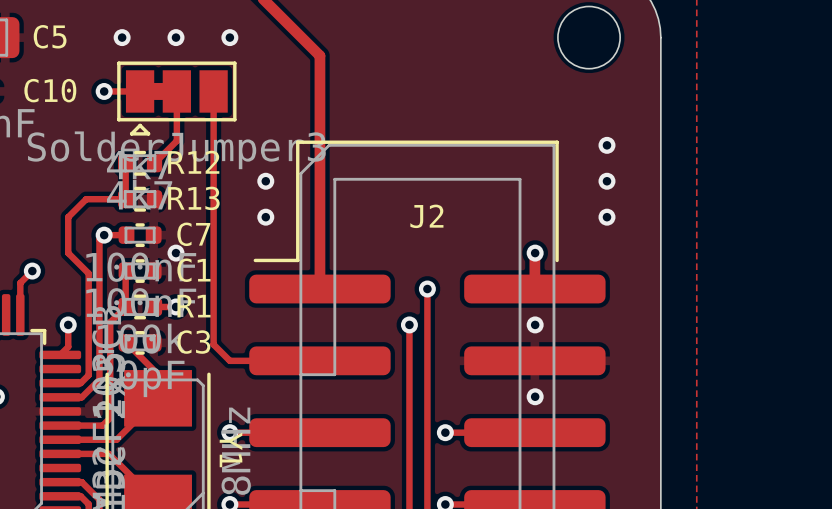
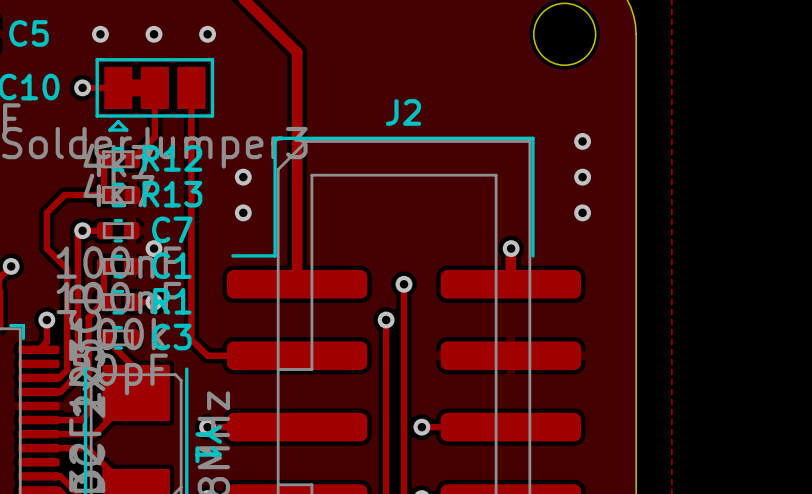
J2 name position: J2 (426, 216) -> J2 (403, 112)
via: (535, 324) -> none
via: (535, 396) -> none

